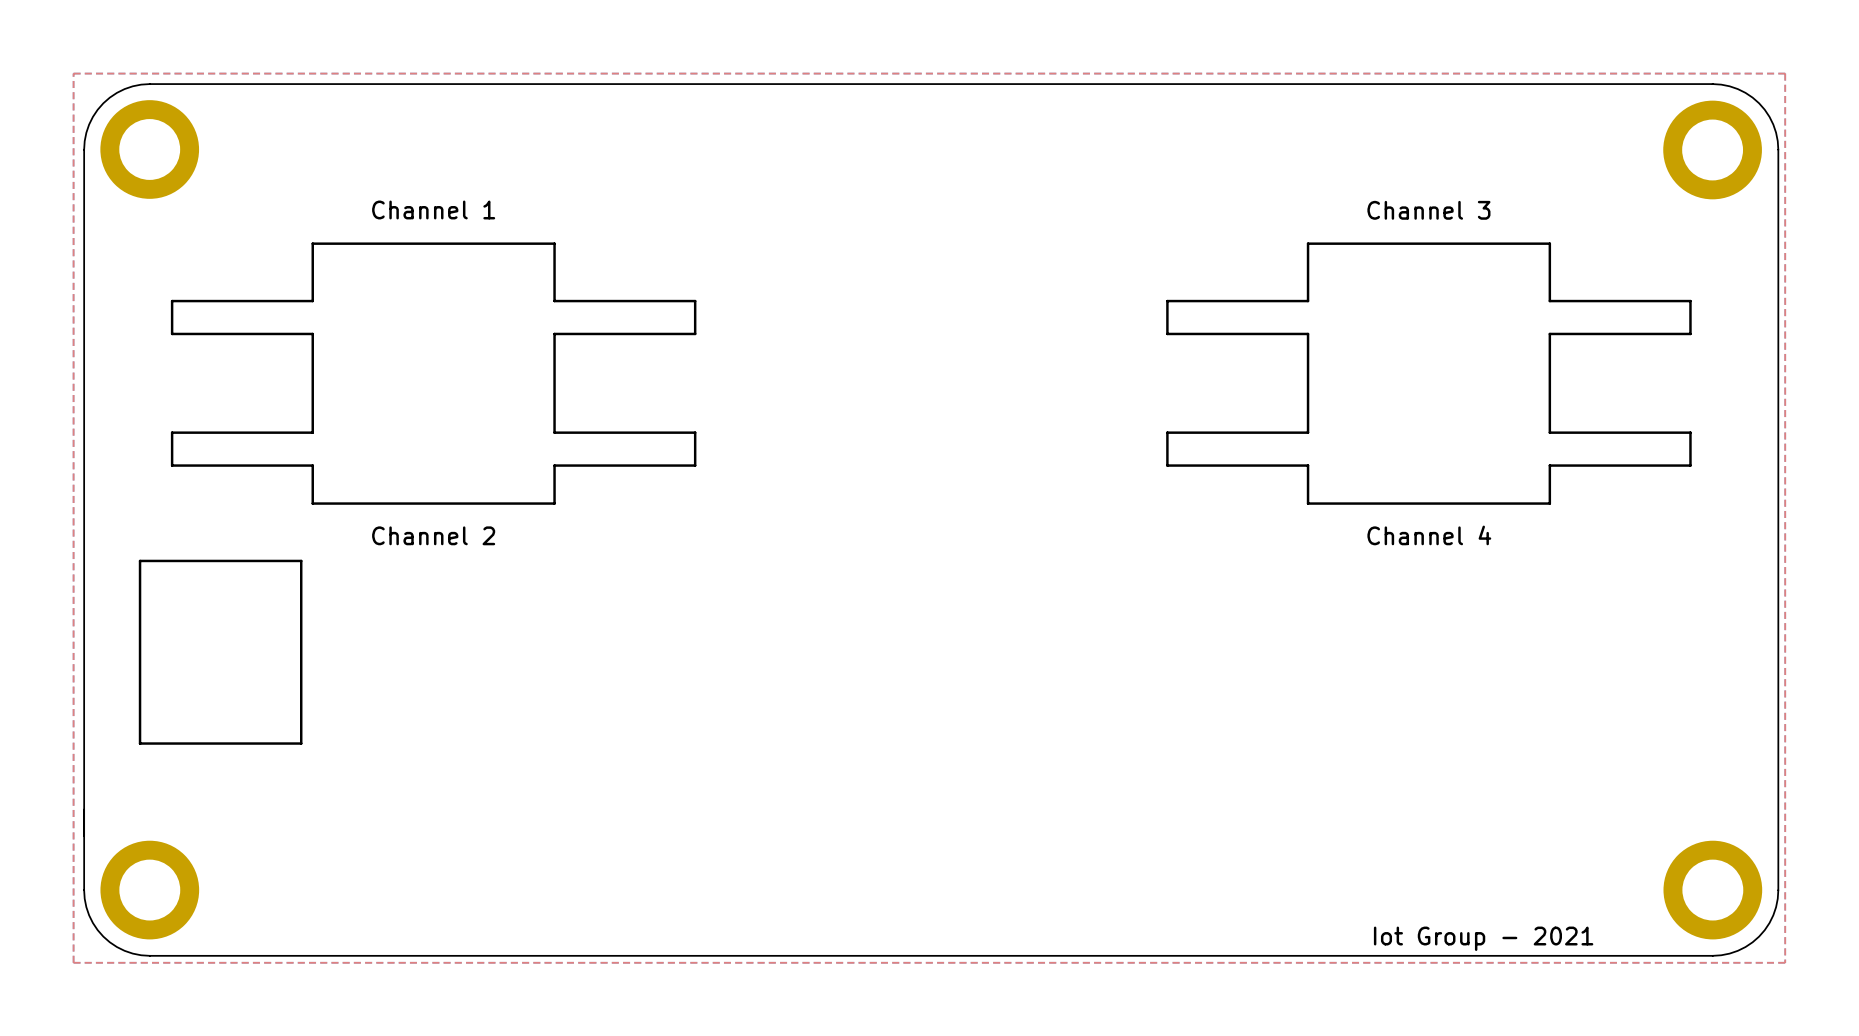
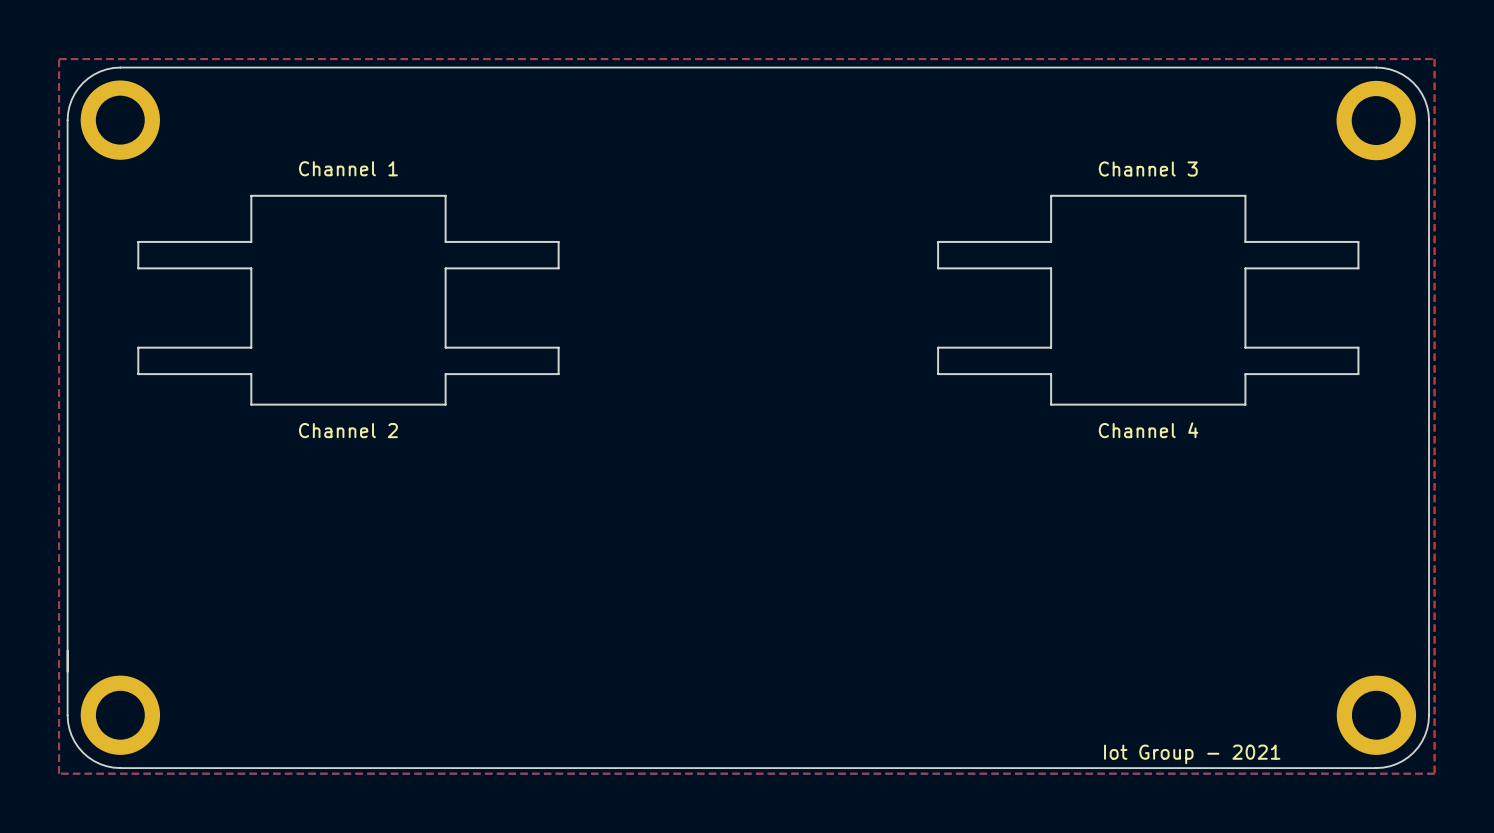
board edge: (140, 560) (140, 743) (301, 743) (301, 560) (140, 560) -> none

